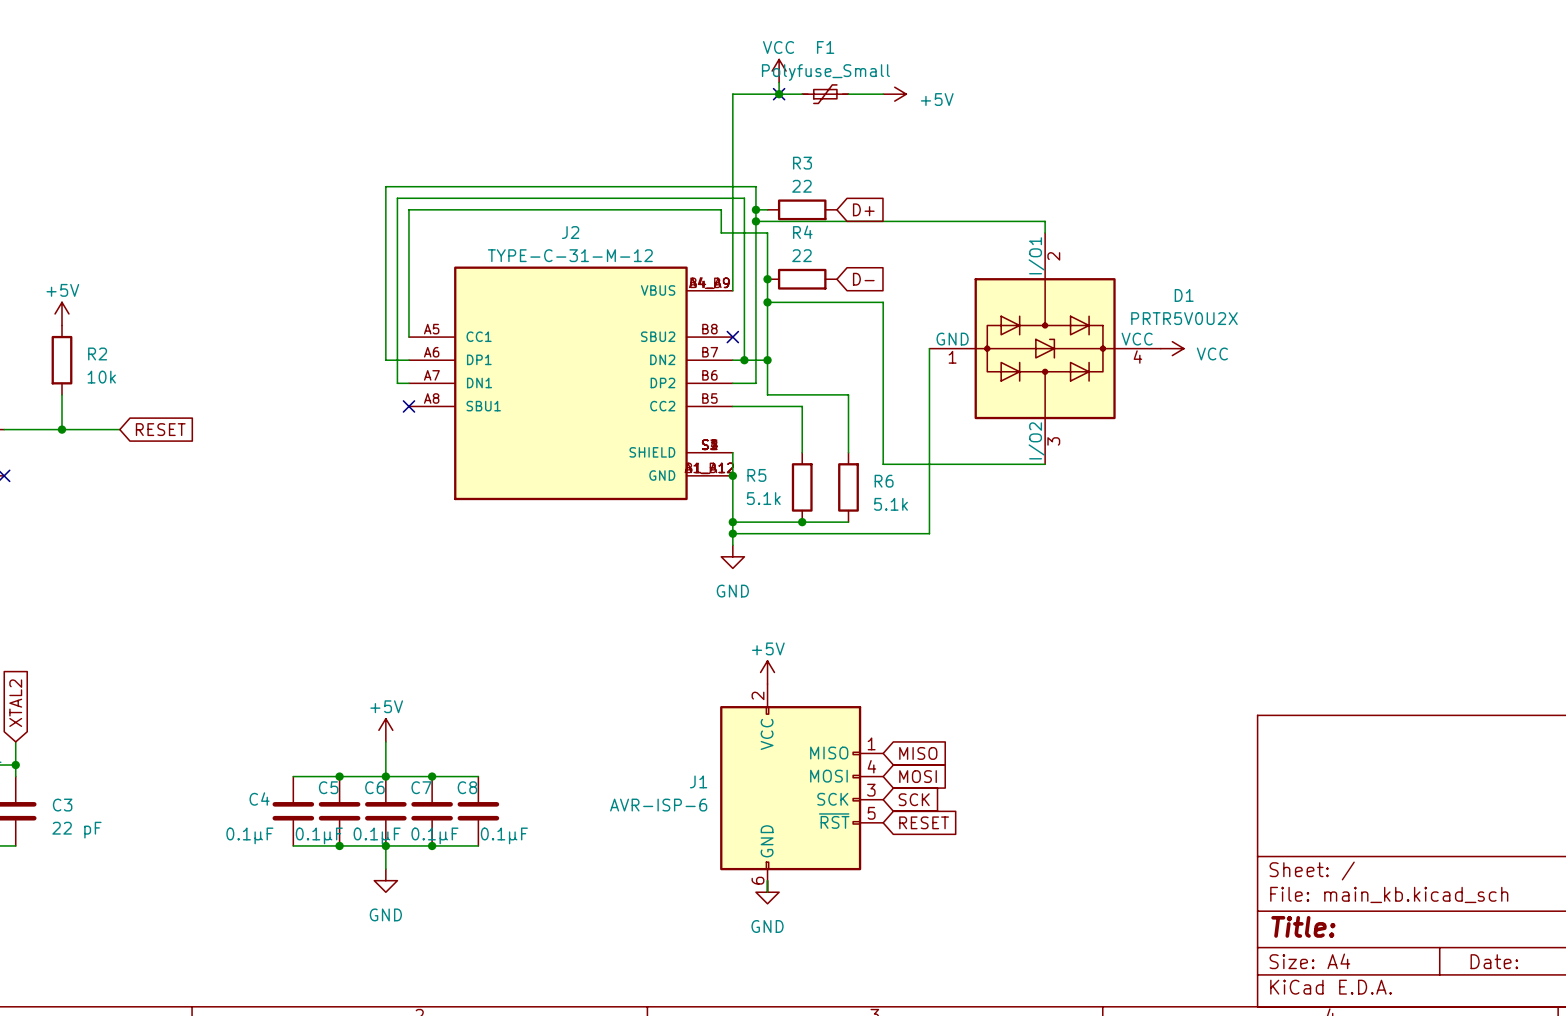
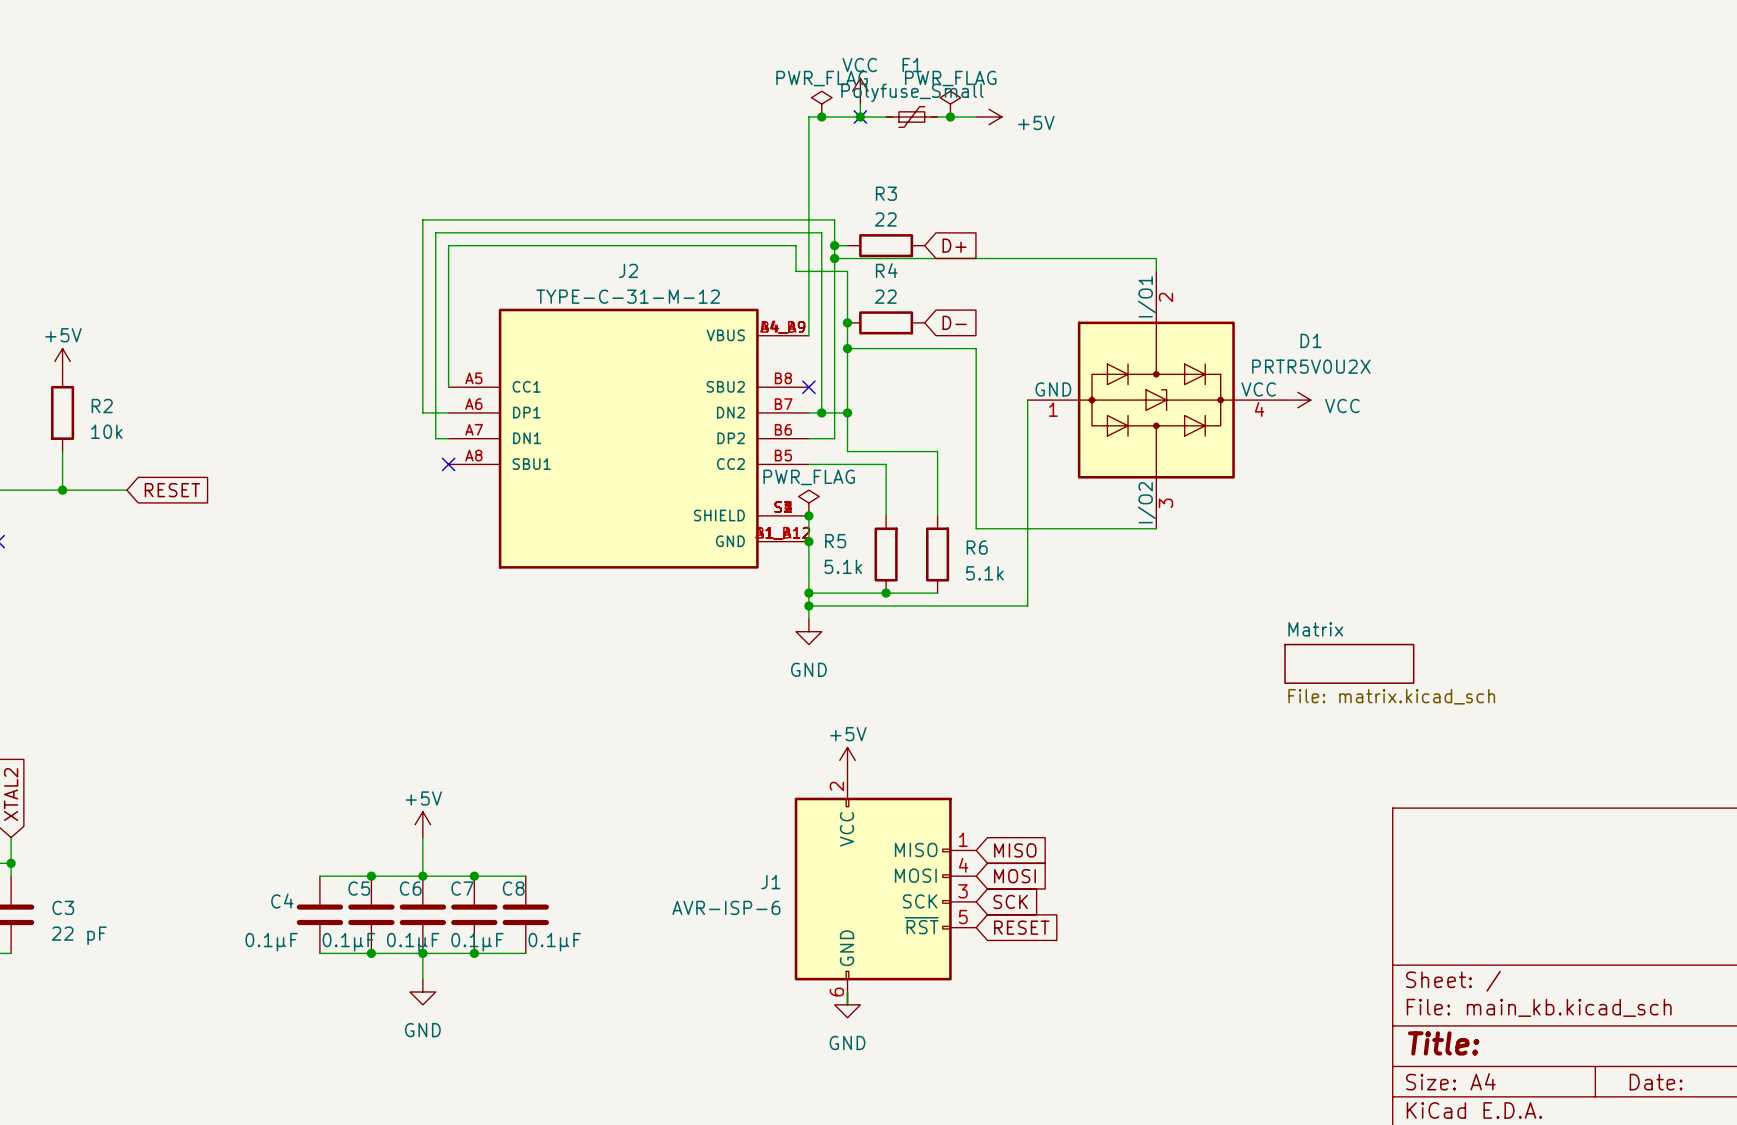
power symbol: none -> PWR_FLAG (821, 104)
power symbol: none -> PWR_FLAG (950, 104)
junction: none -> (821, 116)
junction: none -> (950, 116)
power symbol: none -> PWR_FLAG (808, 503)
junction: none -> (808, 515)
sheet Matrix: none -> File: matrix.kicad_sch (1349, 663)

